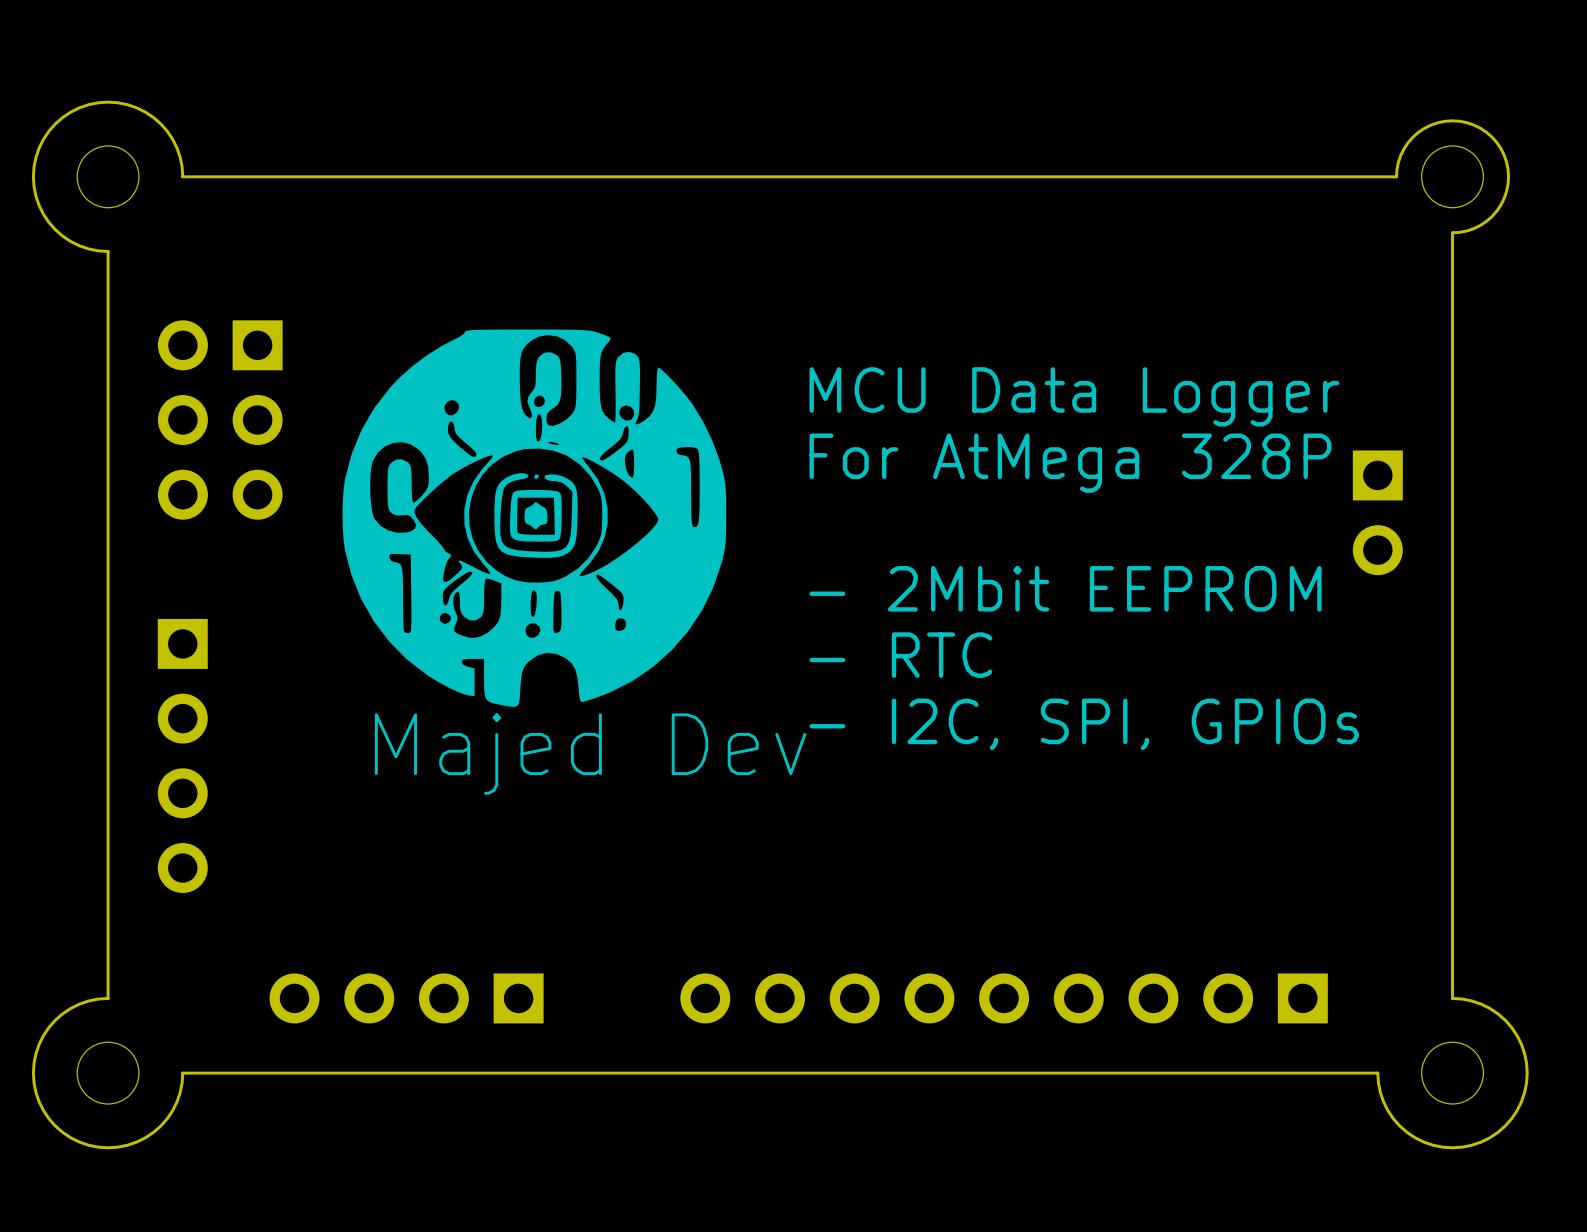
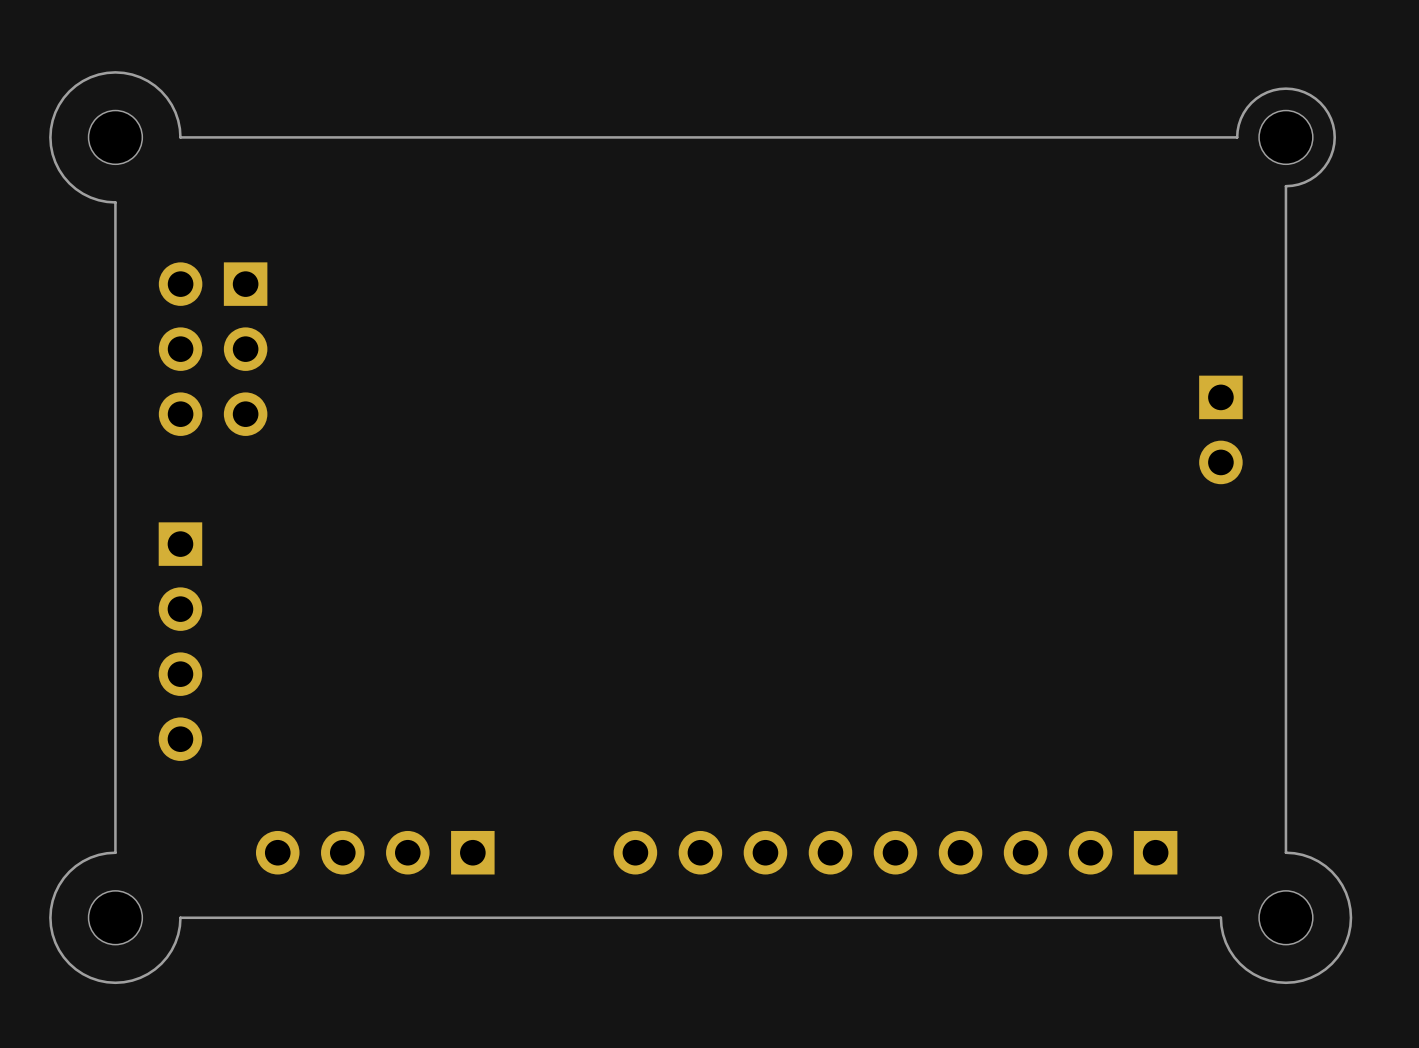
drawing: [342, 329, 727, 707] -> none
text: MCU Data Logger (1074, 396) -> none
text: For AtMega 328P (1070, 463) -> none
text: - 2Mbit EEPROM (1065, 588) -> none
text: - RTC (900, 655) -> none
text: - I2C, SPI, GPIOs (1084, 724) -> none

